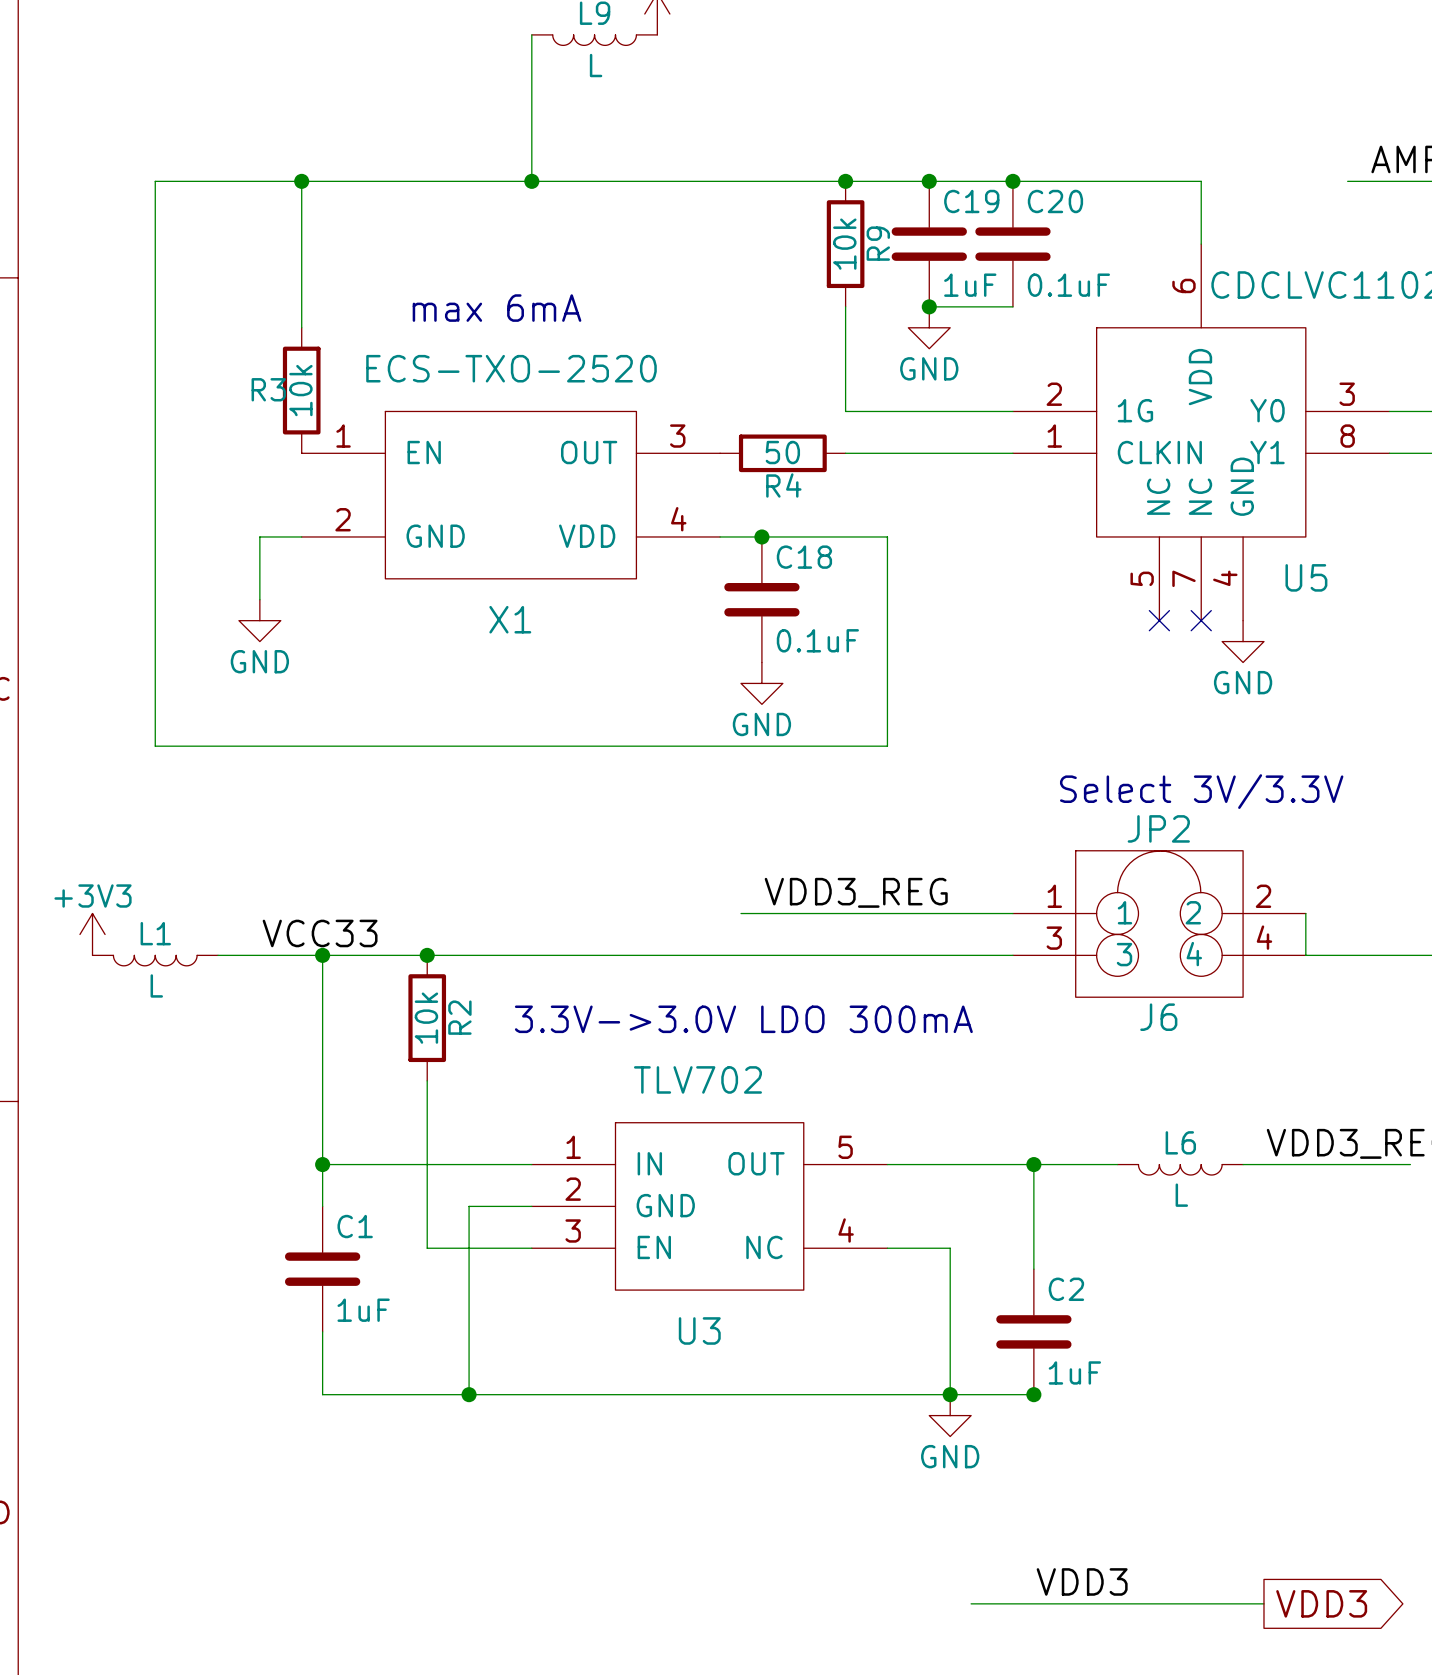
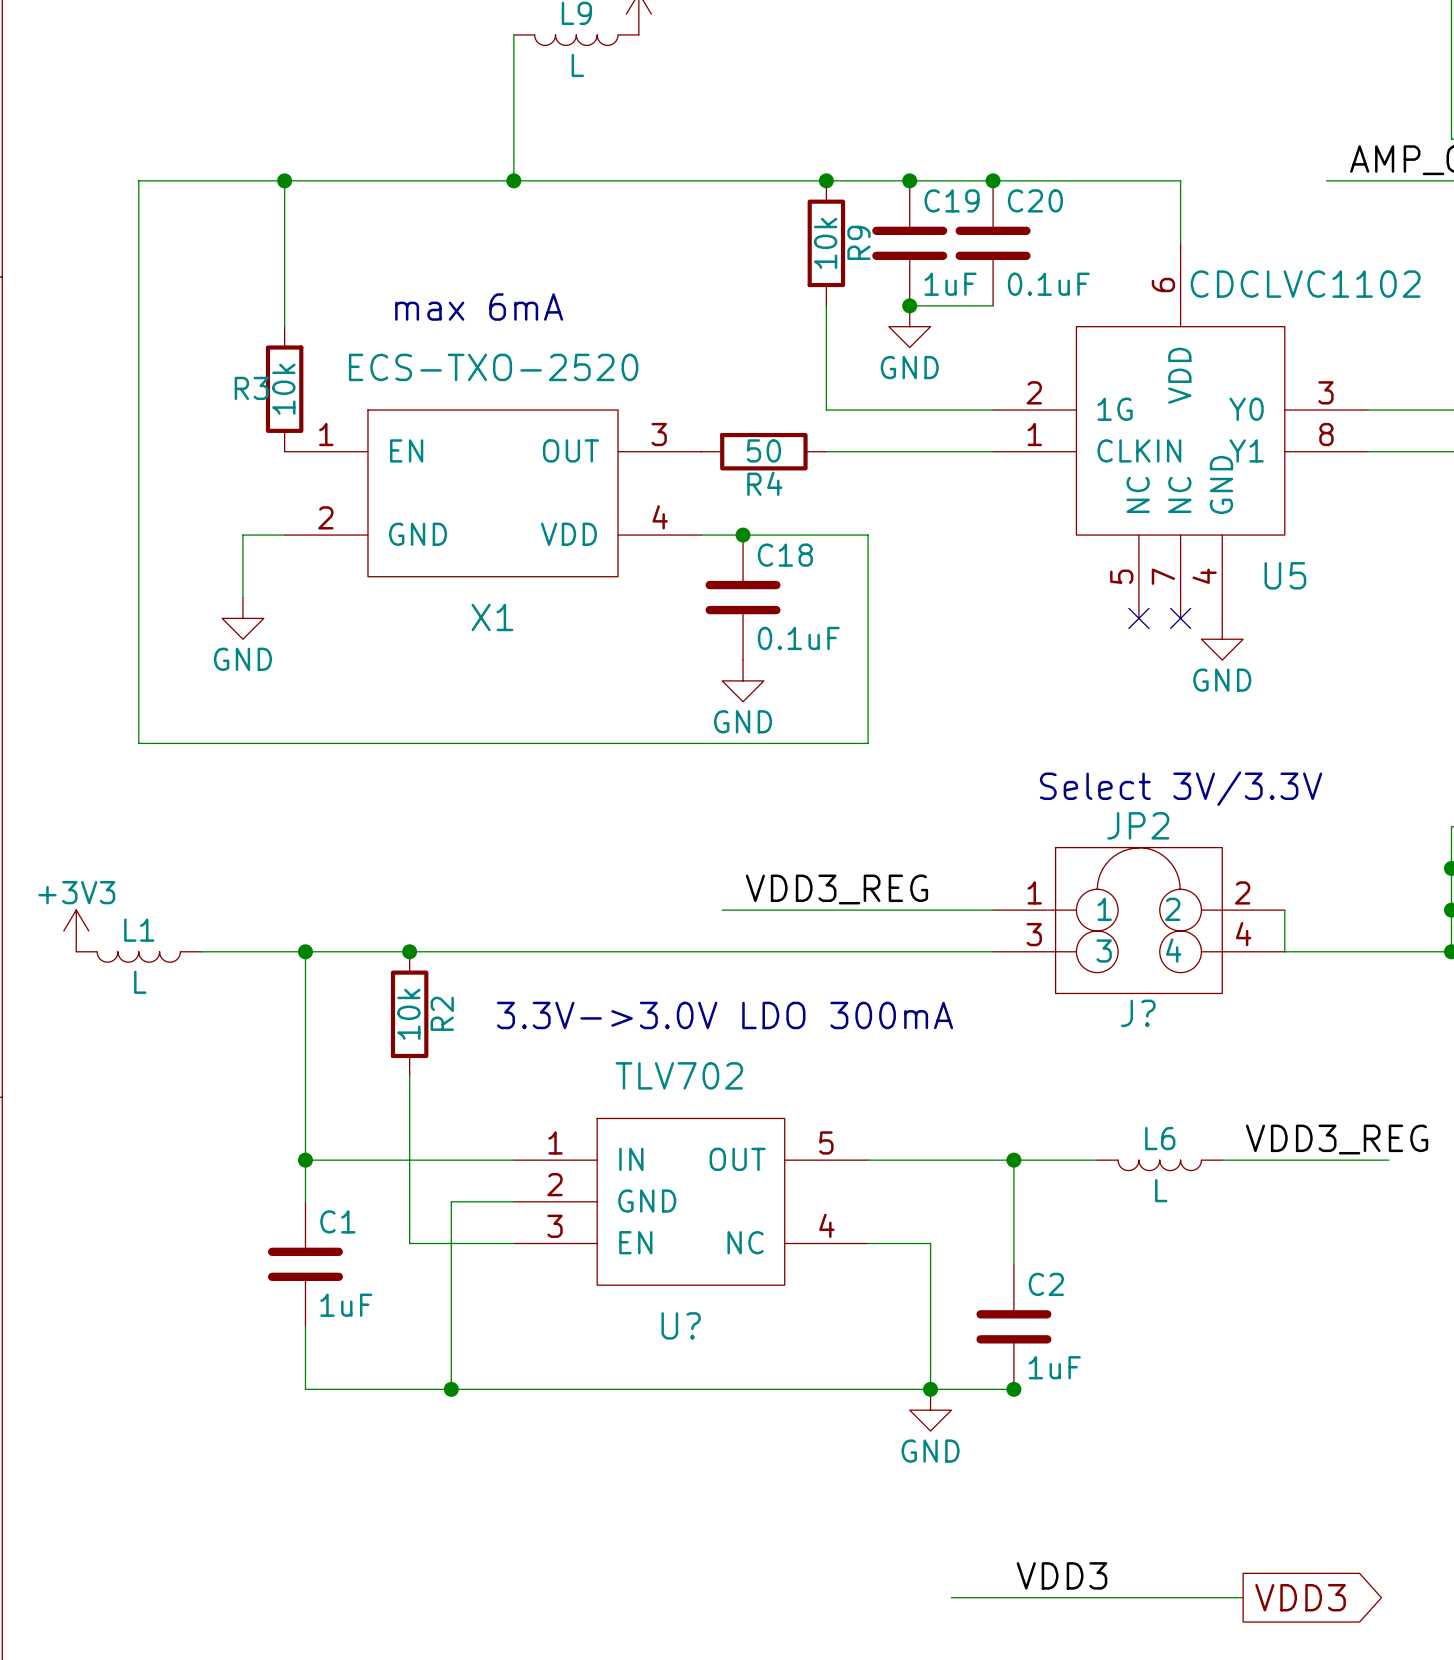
label: VCC33 (320, 933) -> none
J6 name: J6 (1158, 1017) -> J? (1138, 1013)
U3 name: U3 (699, 1330) -> U? (681, 1325)

